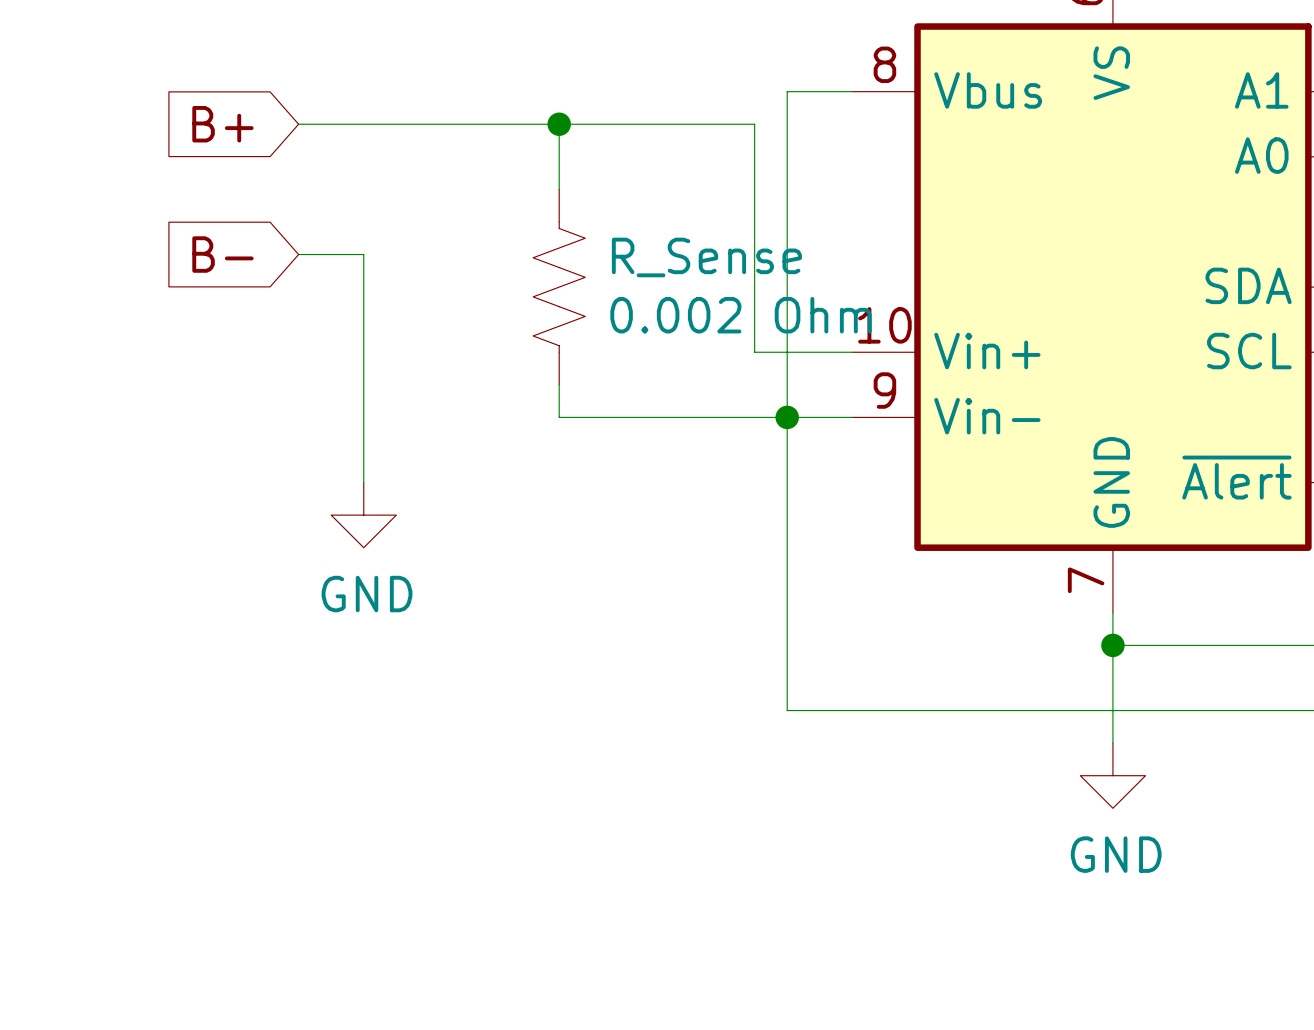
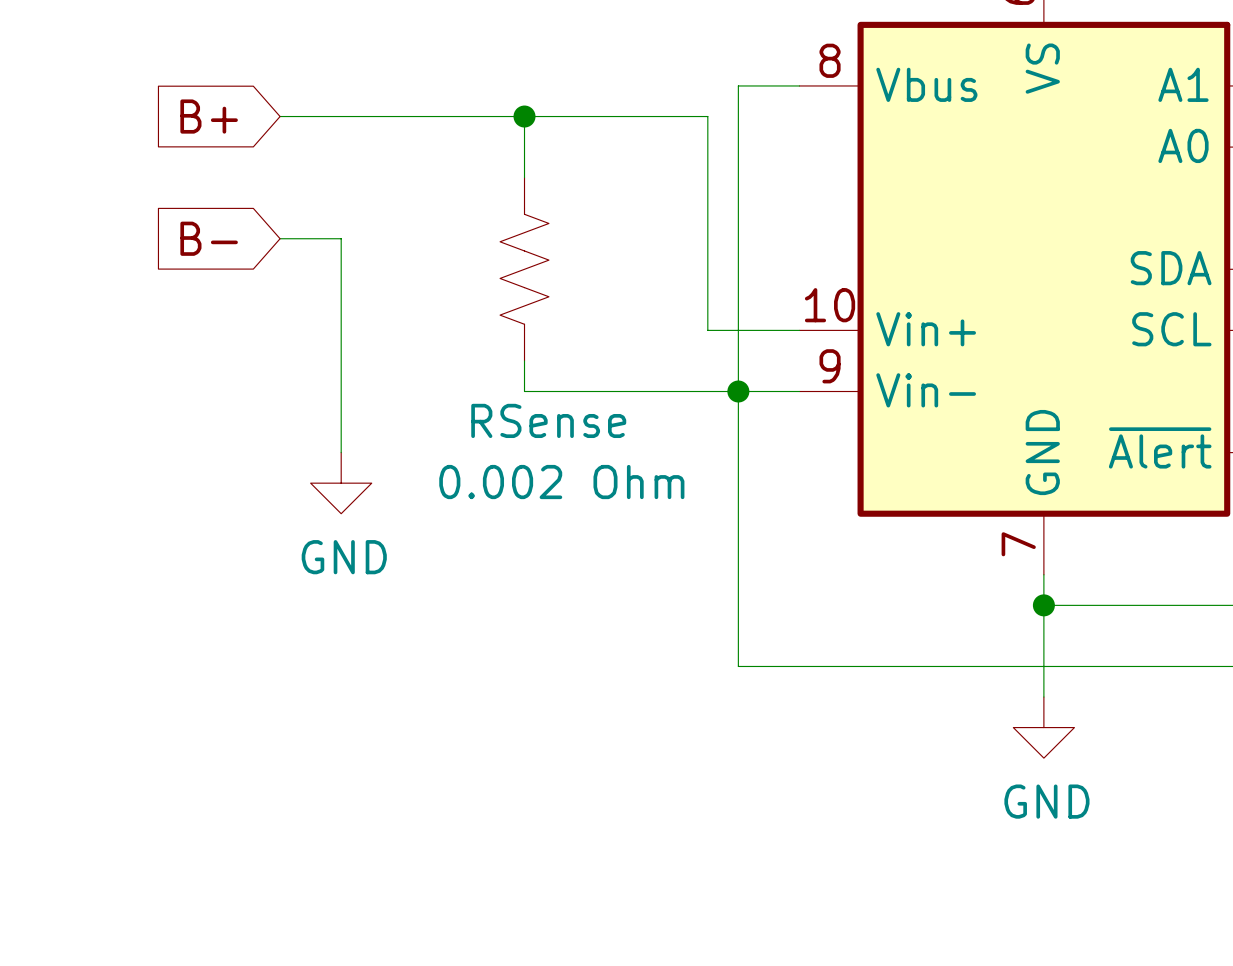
R_Sense name: R_Sense (706, 257) -> RSense (548, 420)
R_Sense value position: 0.002 Ohm (741, 315) -> 0.002 Ohm (561, 482)

